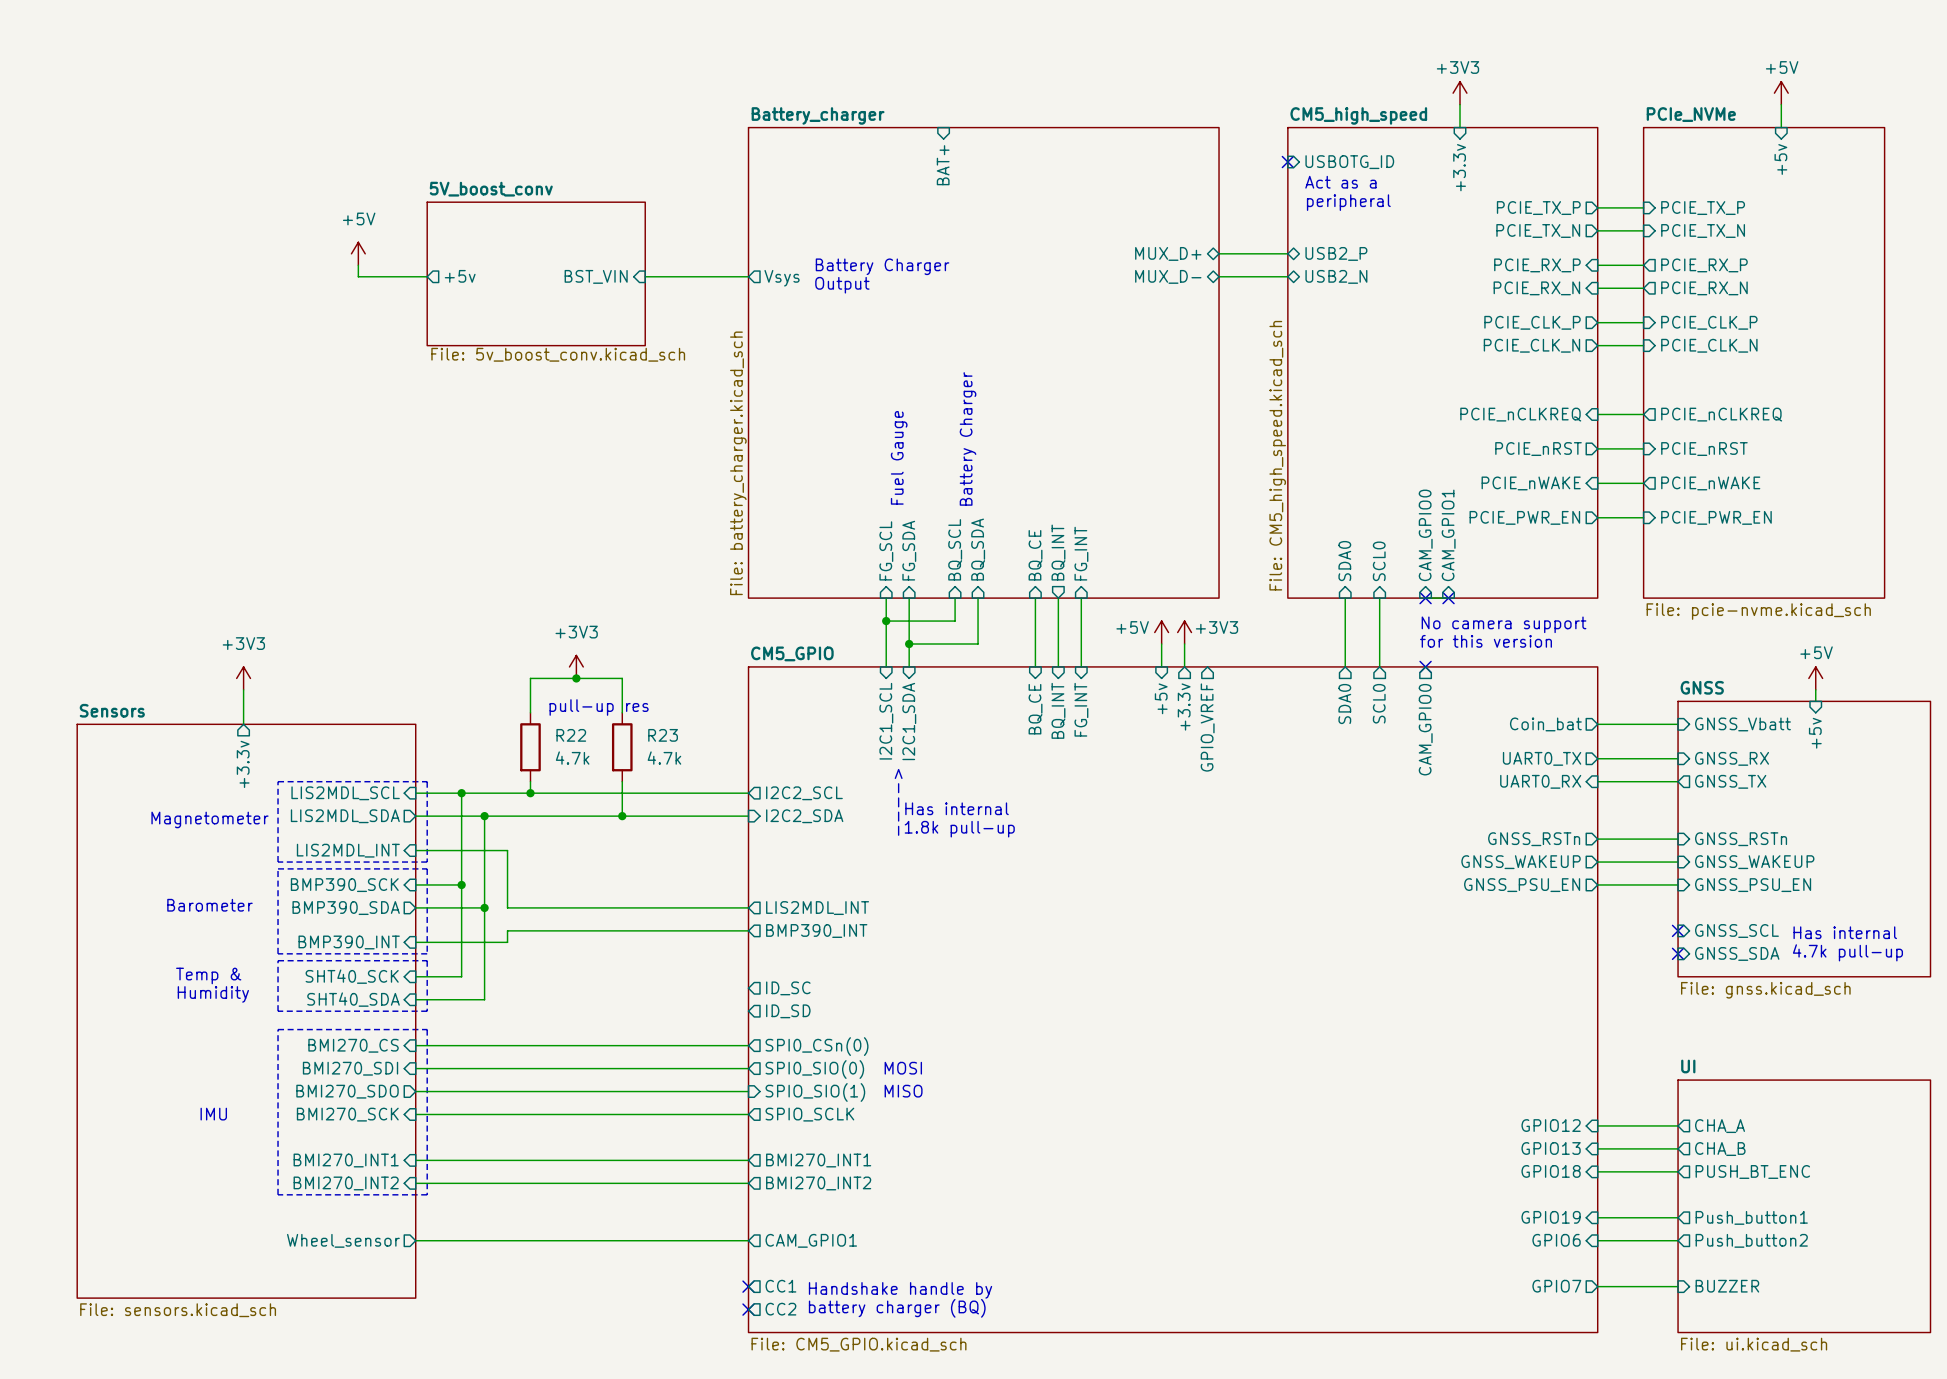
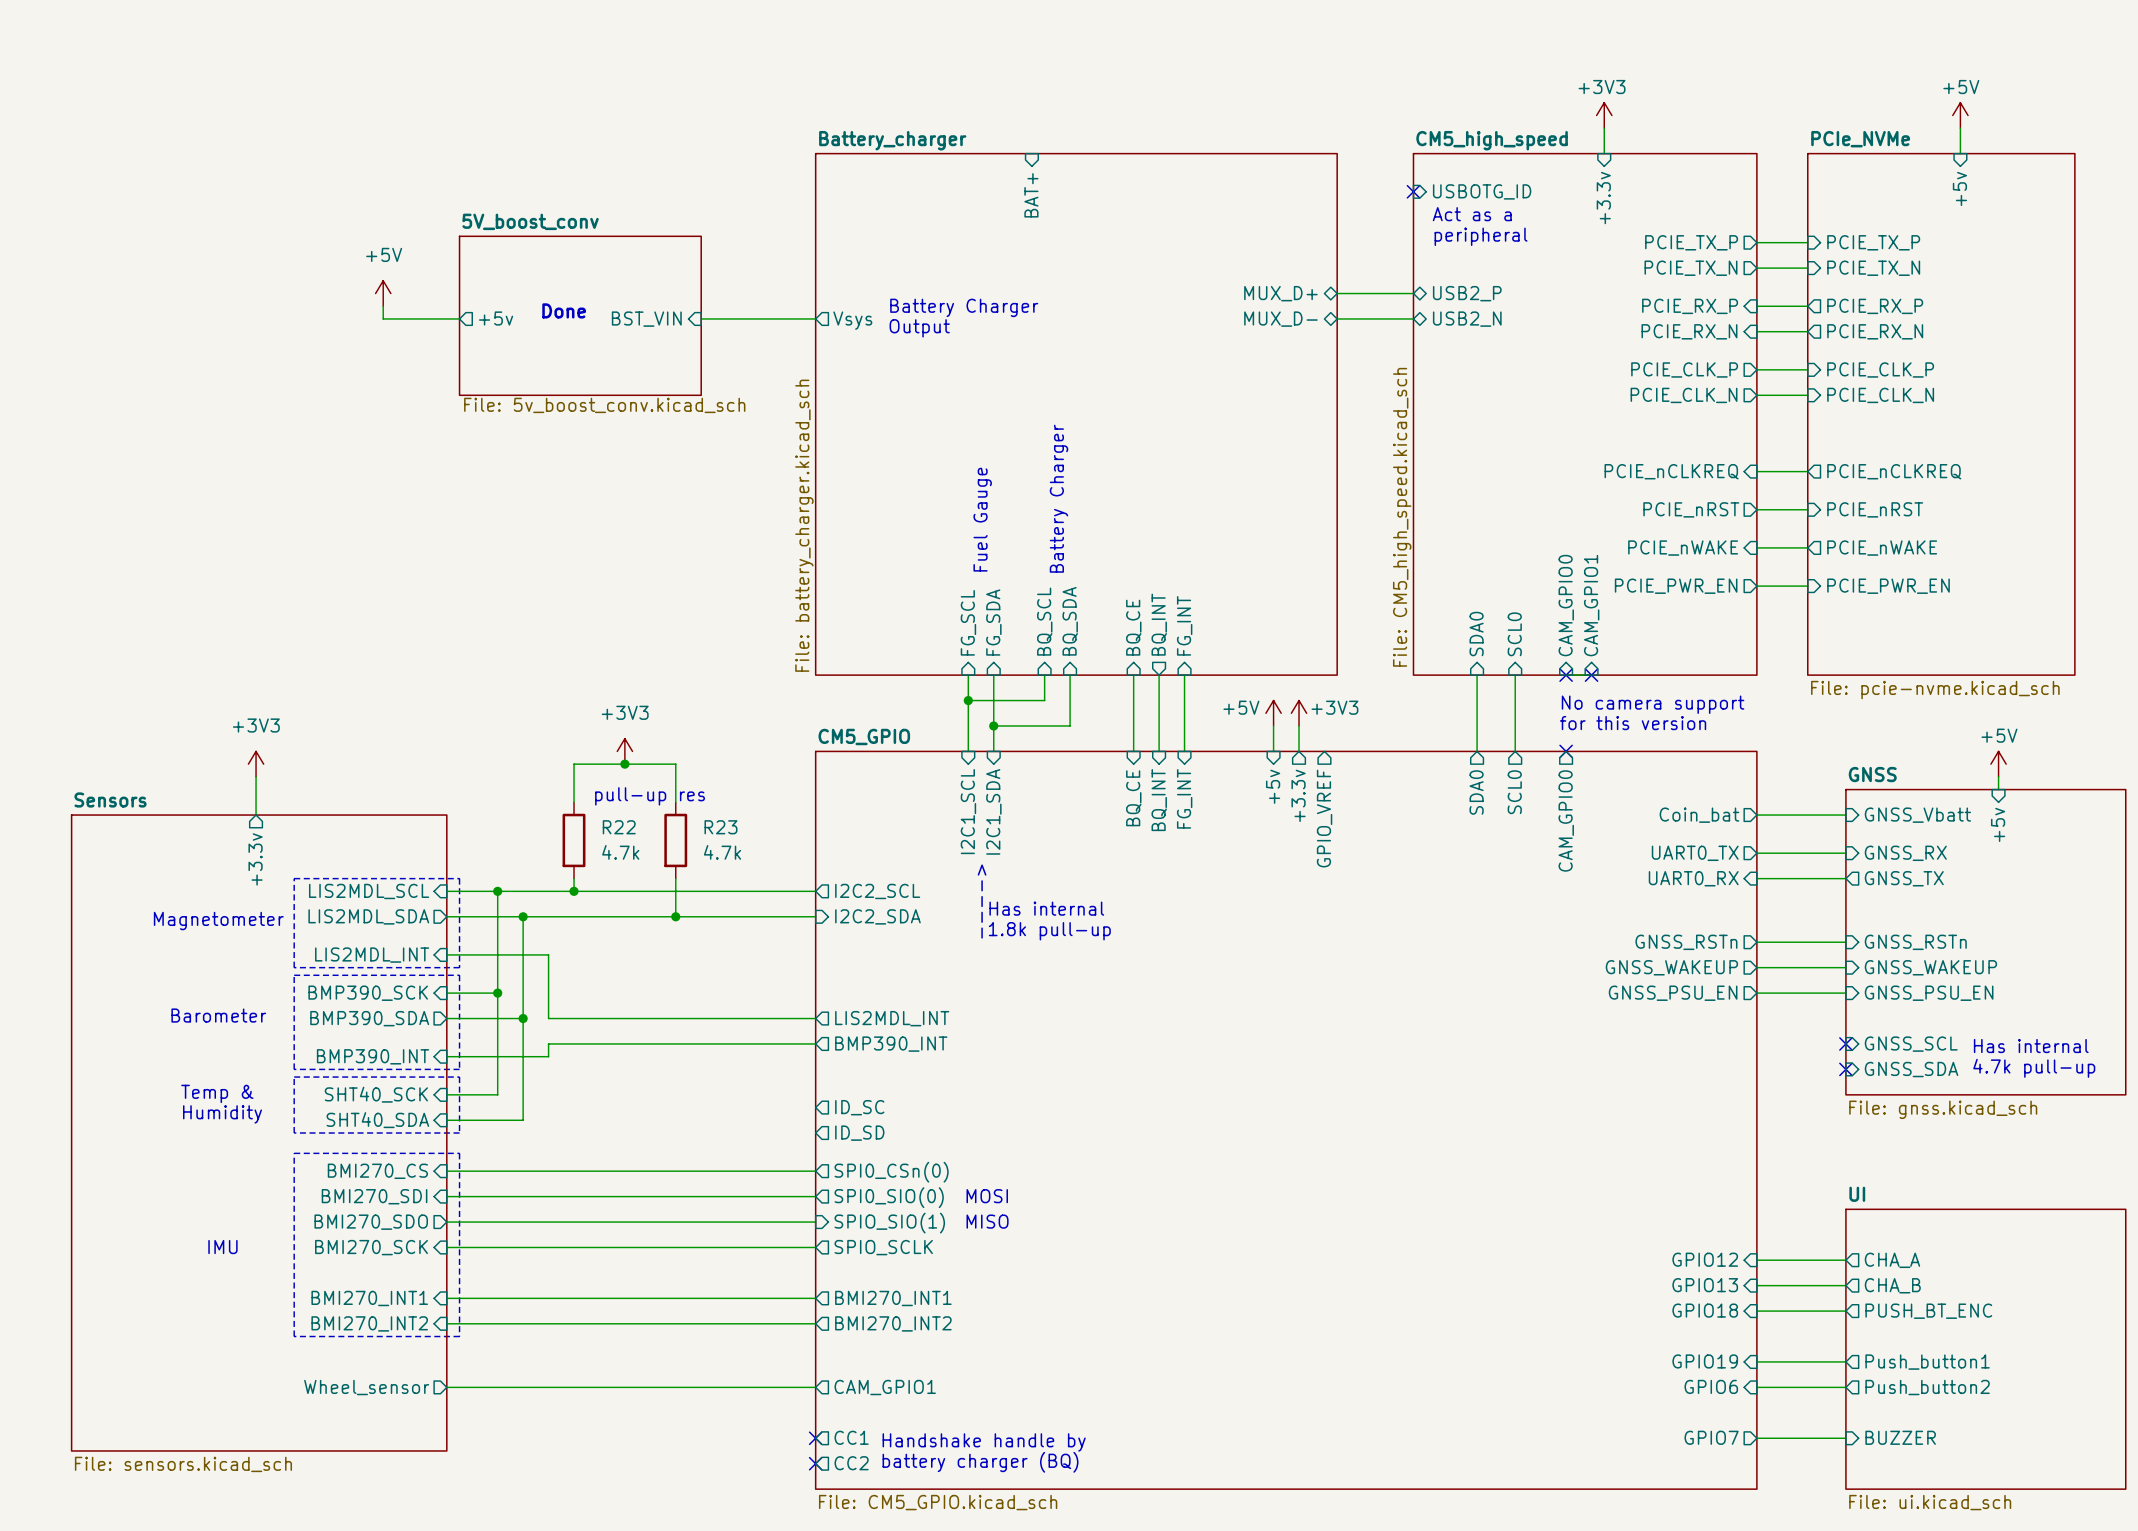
text: none -> Done (564, 310)

